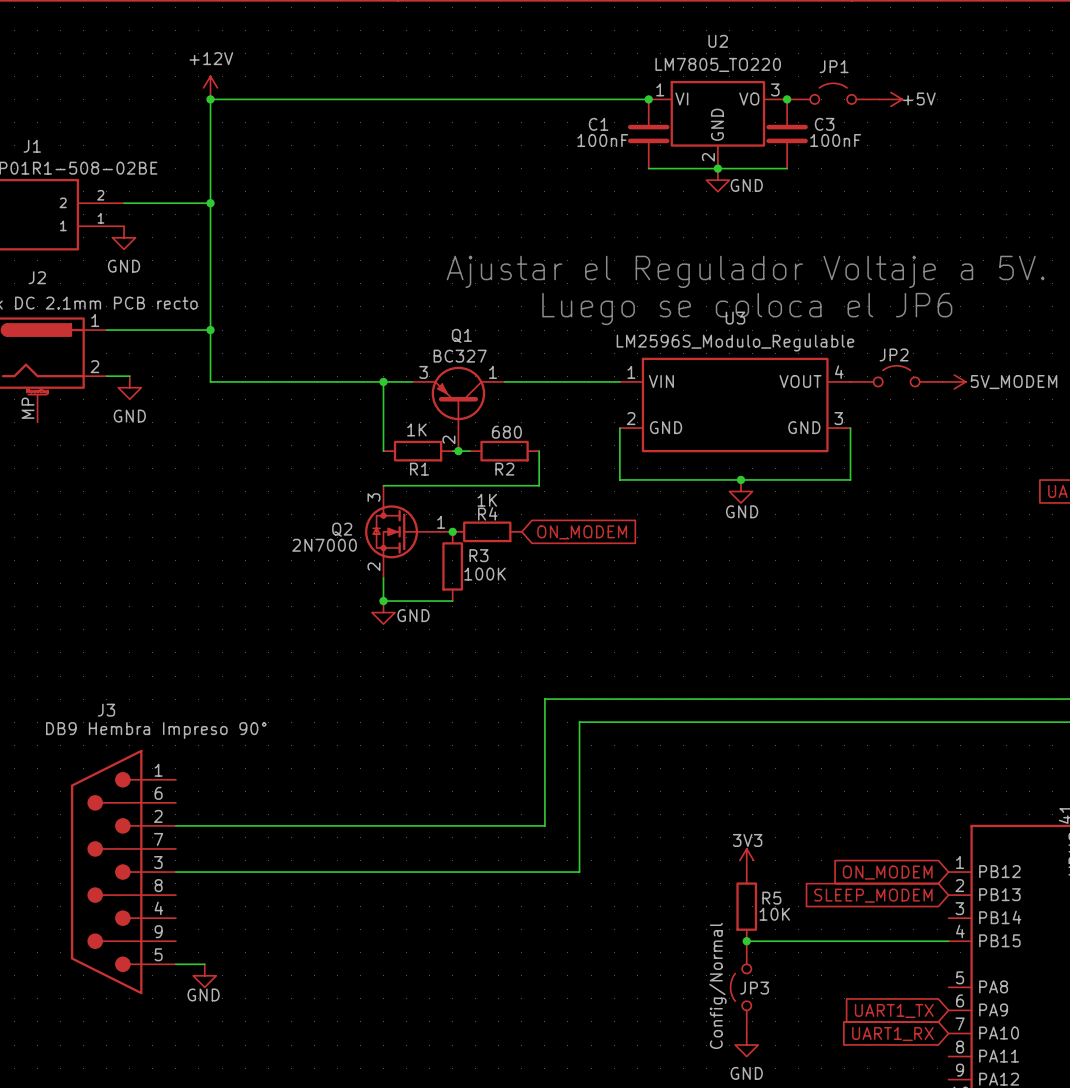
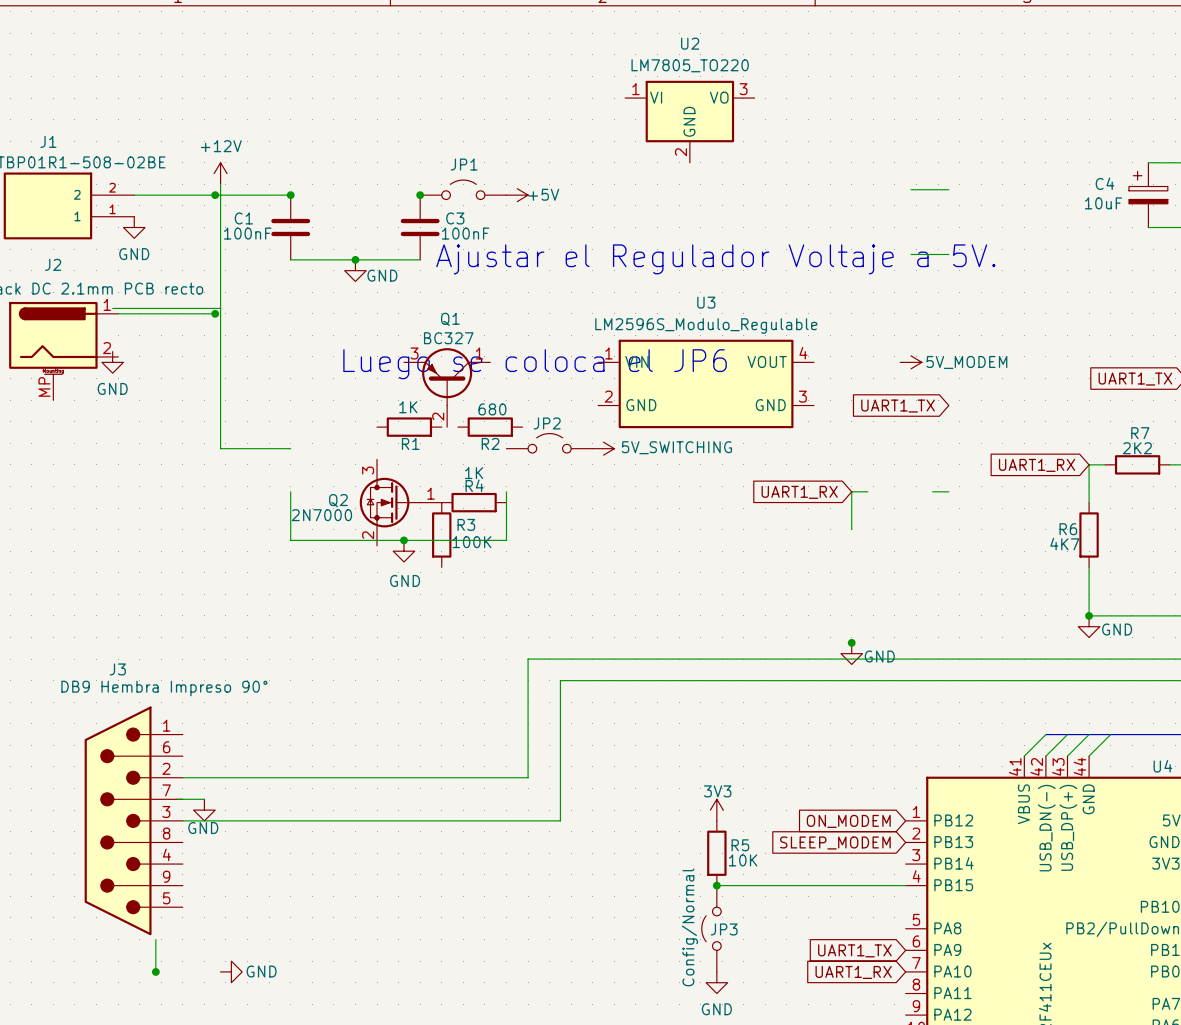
power symbol position: +12V (210, 87) -> +12V (220, 173)
JP1 position: (833, 93) -> (463, 189)
junction: (210, 99) -> none
wire: (648, 99) (210, 99) (210, 381) (412, 381) -> none
junction: (648, 99) -> none
junction: (787, 99) -> none
power symbol: +5V (890, 99) -> none
C1 position: (648, 134) -> (290, 227)
C3 position: (787, 134) -> (420, 227)
wire: (648, 168) (787, 168) -> none
junction: (717, 168) -> none
power symbol: GND (717, 180) -> none
wire: none -> (220, 184) (220, 448) (290, 448)
wire: none -> (911, 189) (948, 189)
wire: none -> (215, 195) (290, 195)
junction: none -> (290, 195)
junction: none -> (420, 195)
power symbol: none -> +5V (517, 195)
wire: none -> (911, 254) (948, 254)
wire: none -> (290, 259) (420, 259)
junction: none -> (355, 259)
power symbol: none -> GND (355, 270)
text position: Luego se coloca el JP6 (747, 308) -> Luego se coloca el JP6 (535, 364)
wire: none -> (112, 308) (220, 308)
wire: (106, 376) (129, 376) -> none
JP2 position: (896, 376) -> (549, 443)
wire: (383, 381) (383, 451) -> none
junction: (383, 381) -> none
wire: (504, 381) (619, 381) -> none
power symbol position: GND (129, 387) -> GND (112, 362)
wire: (619, 428) (619, 479) (850, 479) (850, 428) -> none
global label: none -> UART1_TX (898, 406)
wire: (452, 451) (469, 451) -> none
junction: (458, 451) -> none
wire: (539, 451) (539, 485) (383, 485) -> none
power symbol: none -> 5V_SWITCHING (603, 448)
junction: (740, 479) -> none
power symbol: GND (740, 491) -> none
wire: none -> (290, 491) (290, 540) (506, 540) (506, 491)
global label: none -> UART1_RX (799, 492)
wire: none -> (867, 491) (851, 491) (851, 529)
wire: none -> (932, 491) (948, 491)
junction: (452, 531) -> none
global label: ON_MODEM (582, 532) -> none
junction: none -> (403, 540)
wire: (383, 577) (383, 601) (452, 601) -> none
junction: (383, 601) -> none
power symbol position: GND (383, 612) -> GND (403, 551)
junction: none -> (851, 642)
power symbol: none -> GND (851, 653)
power symbol: none -> GND (204, 810)
wire: (175, 964) (204, 964) -> (177, 799) (204, 799)
power symbol: GND (204, 975) -> none
wire: none -> (155, 939) (155, 971)
junction: none -> (155, 971)
power symbol: none -> GND (231, 971)

